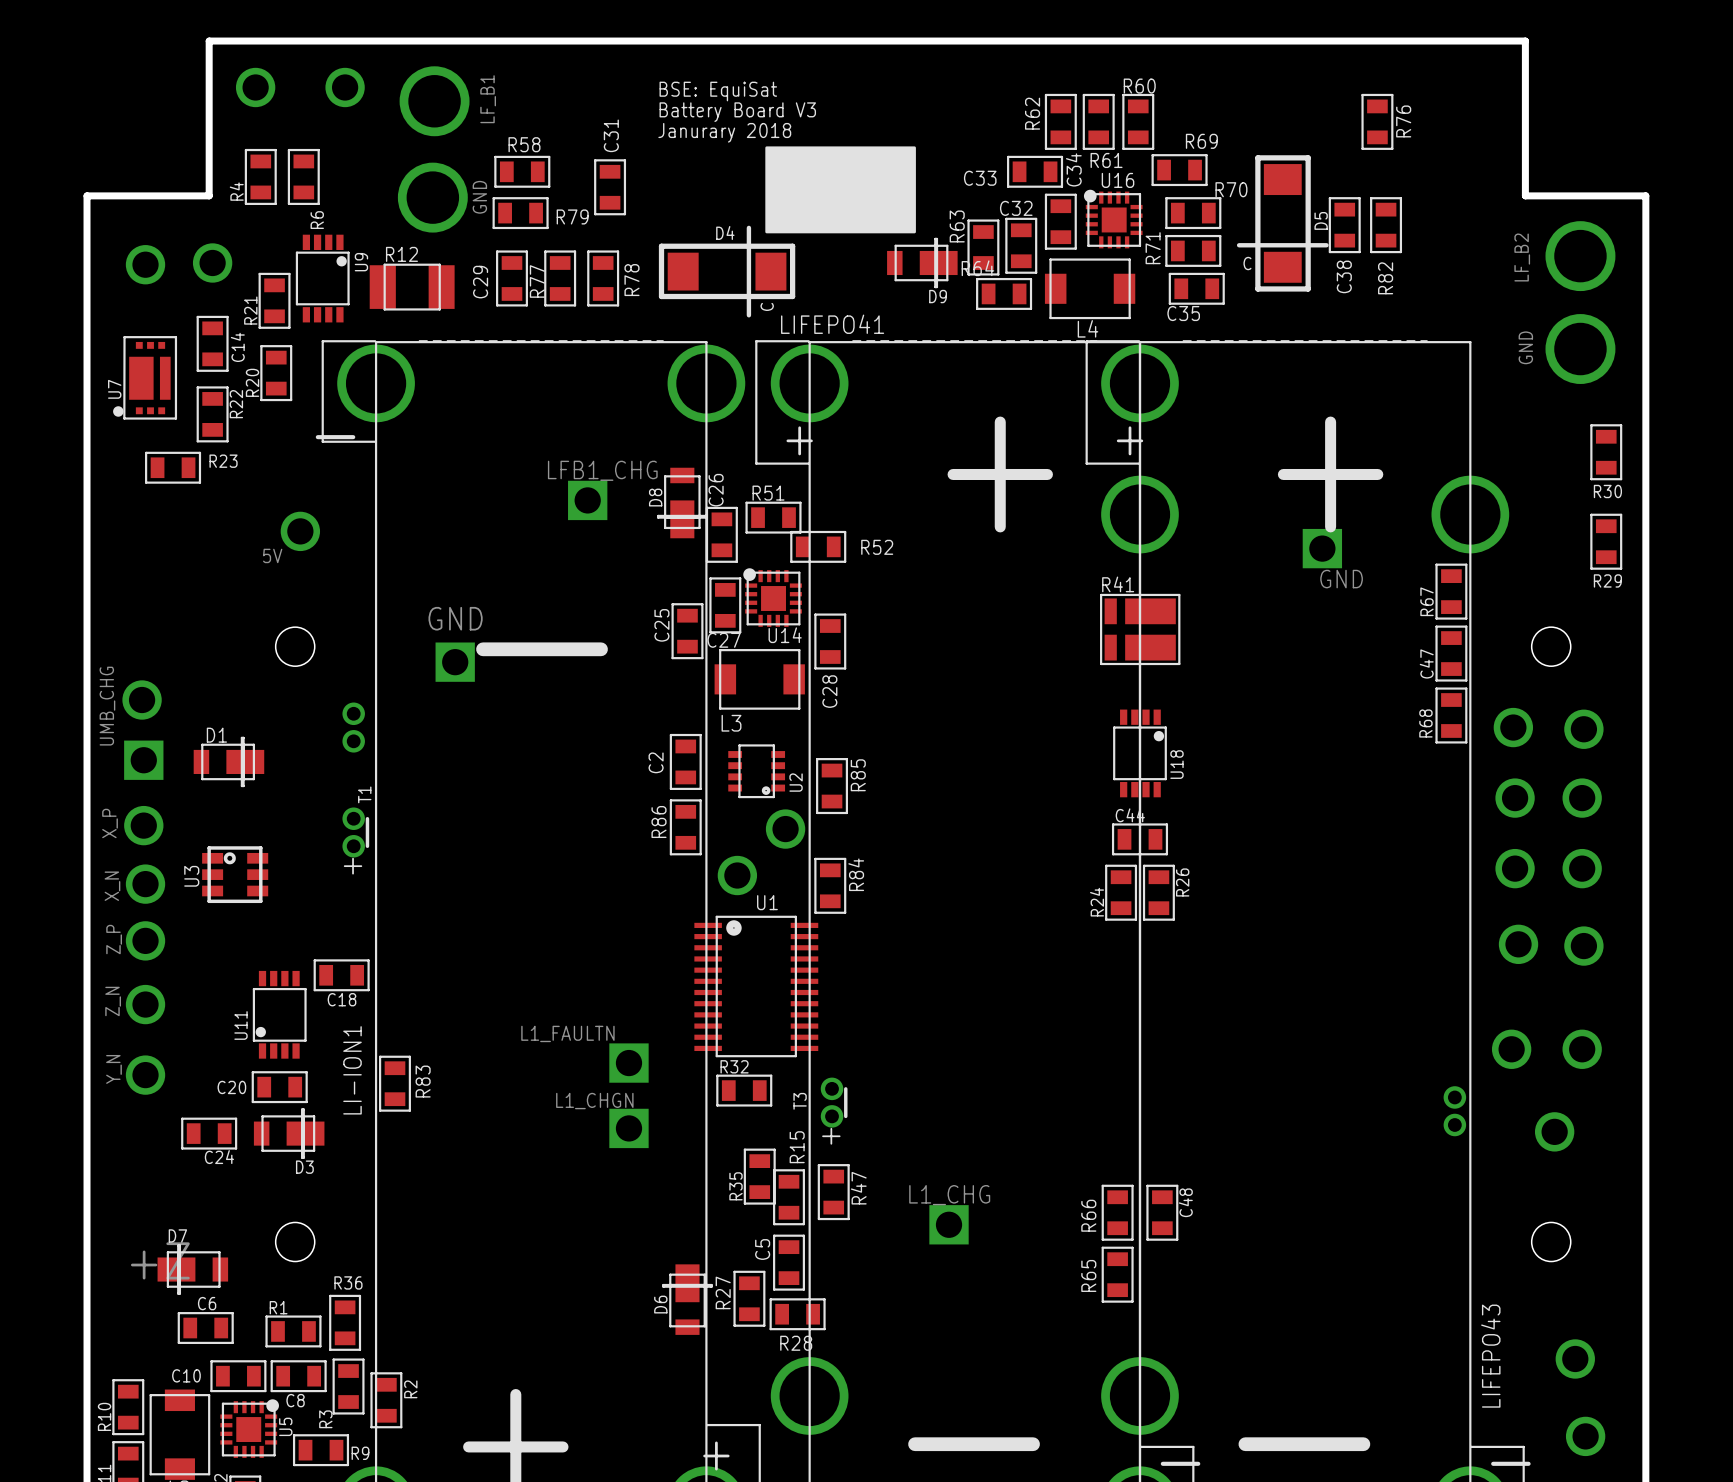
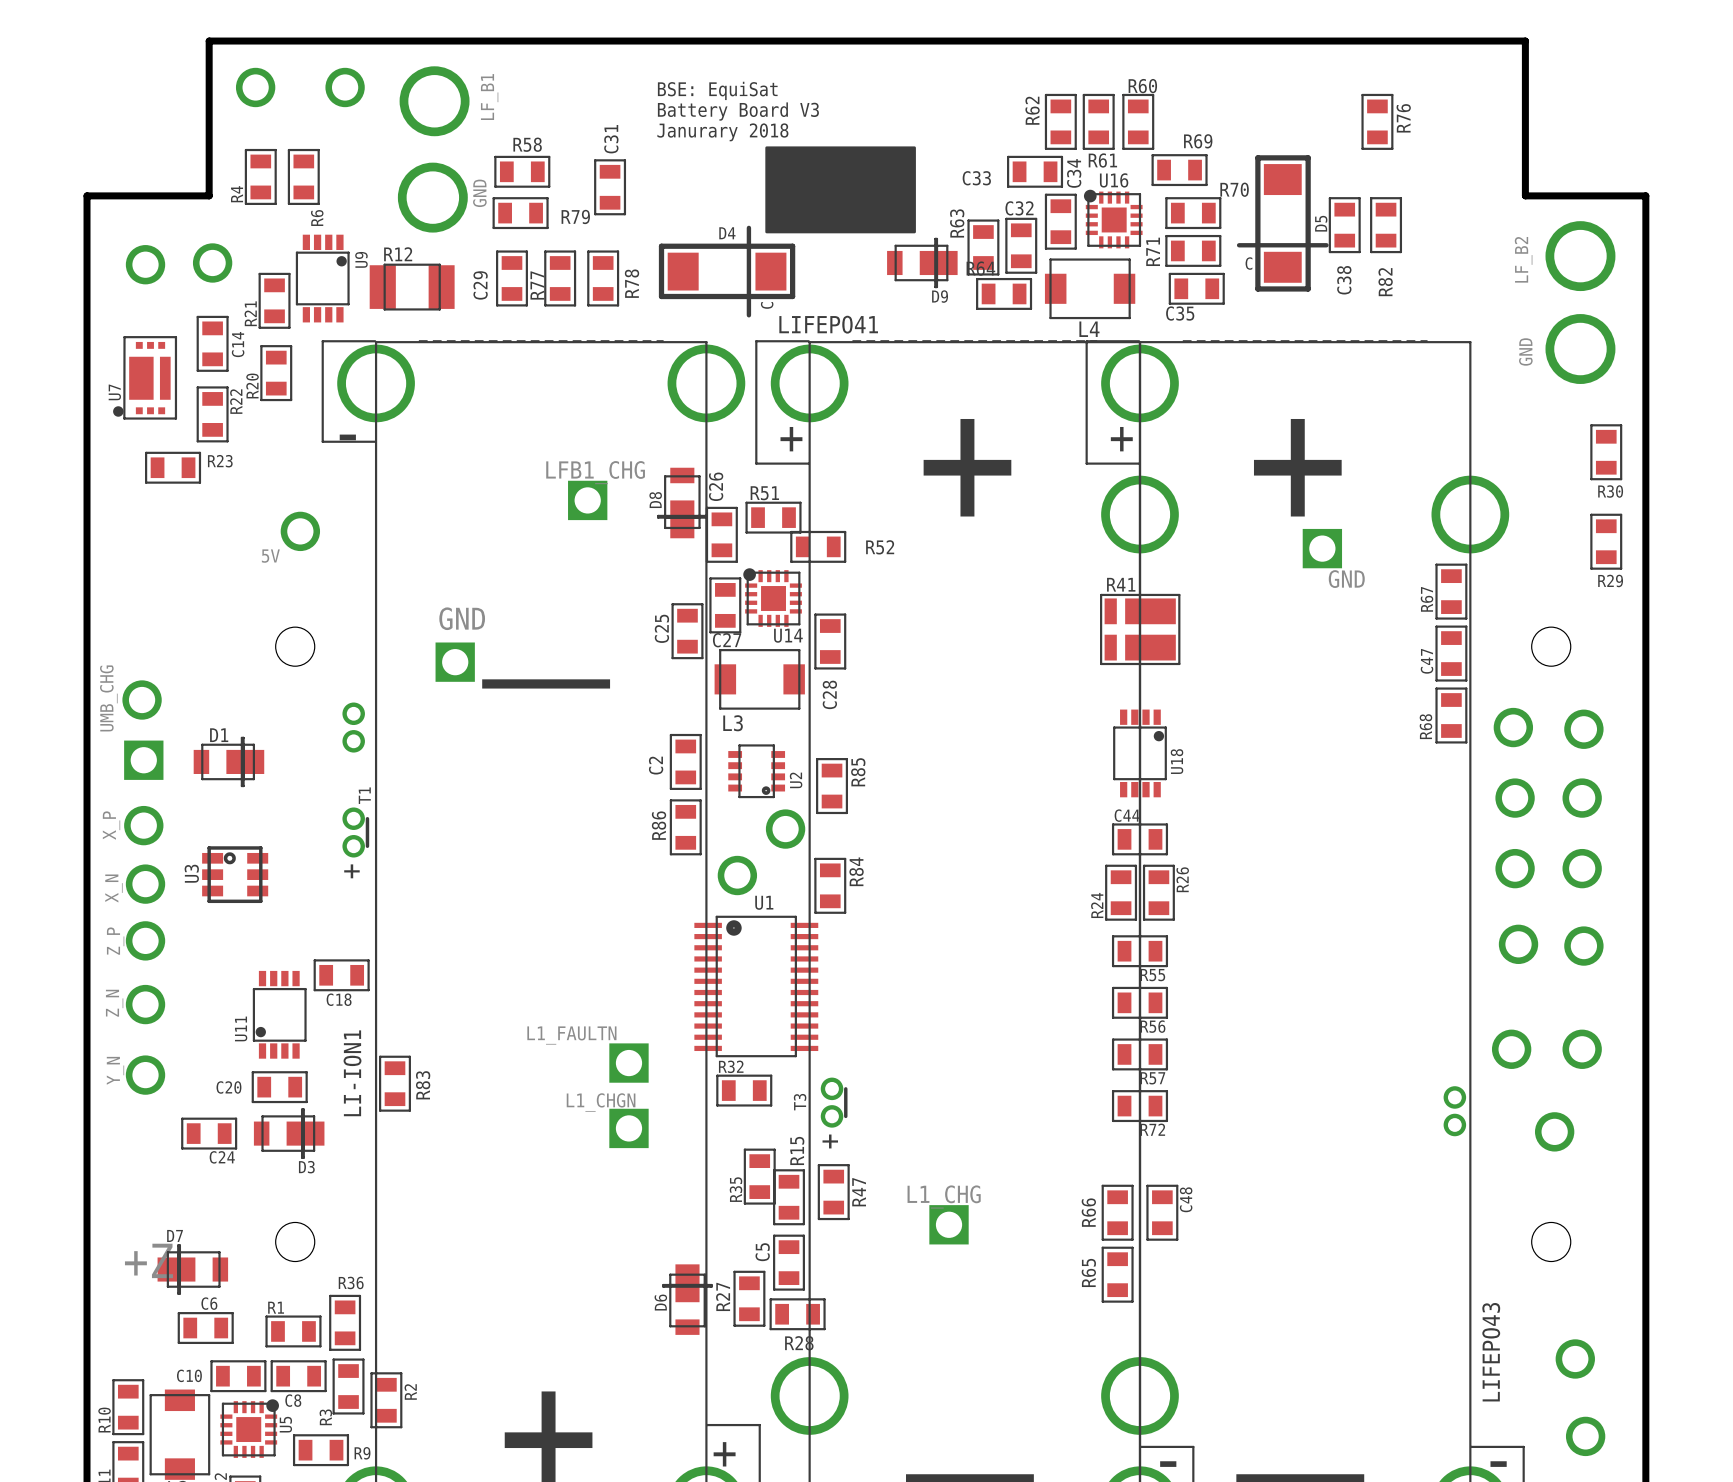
R55: none -> (1139, 951)
R56: none -> (1139, 1002)
R57: none -> (1139, 1054)
R72: none -> (1139, 1106)

